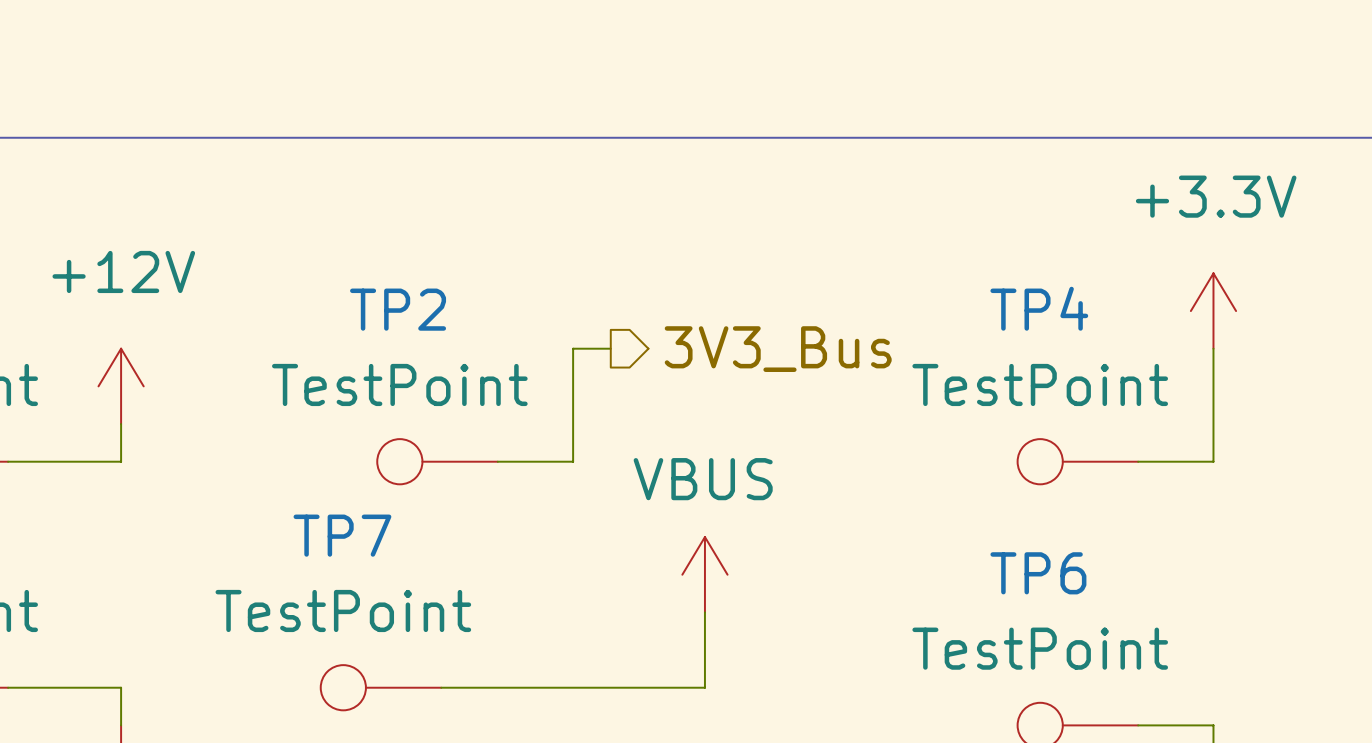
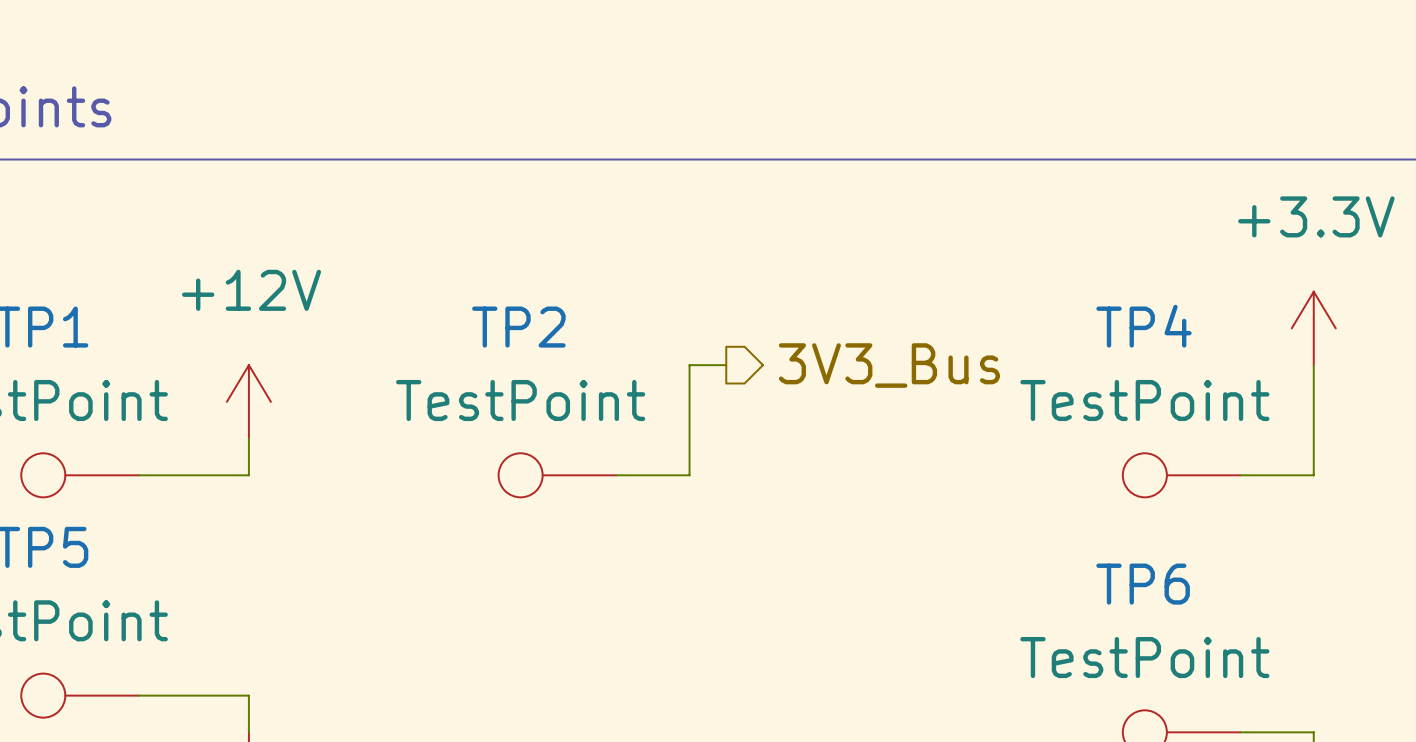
power symbol: VBUS (704, 574) -> none
wire: (704, 612) (704, 687) (441, 687) -> none
TP7: TestPoint (381, 687) -> none

